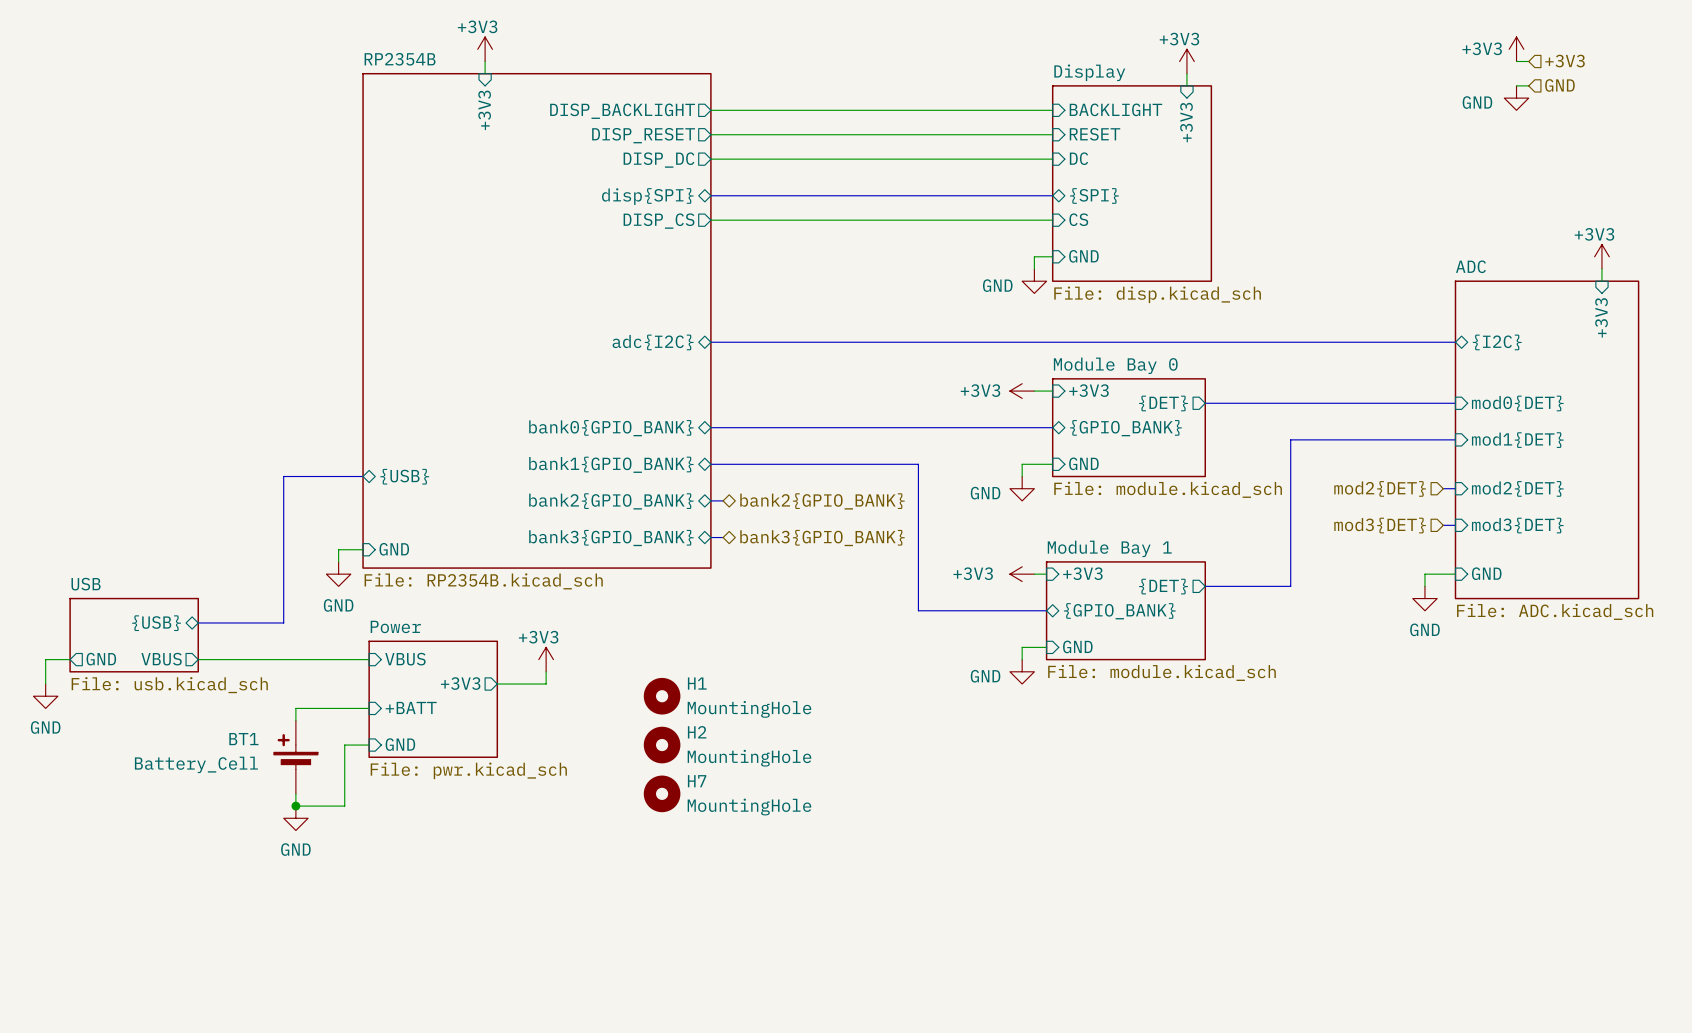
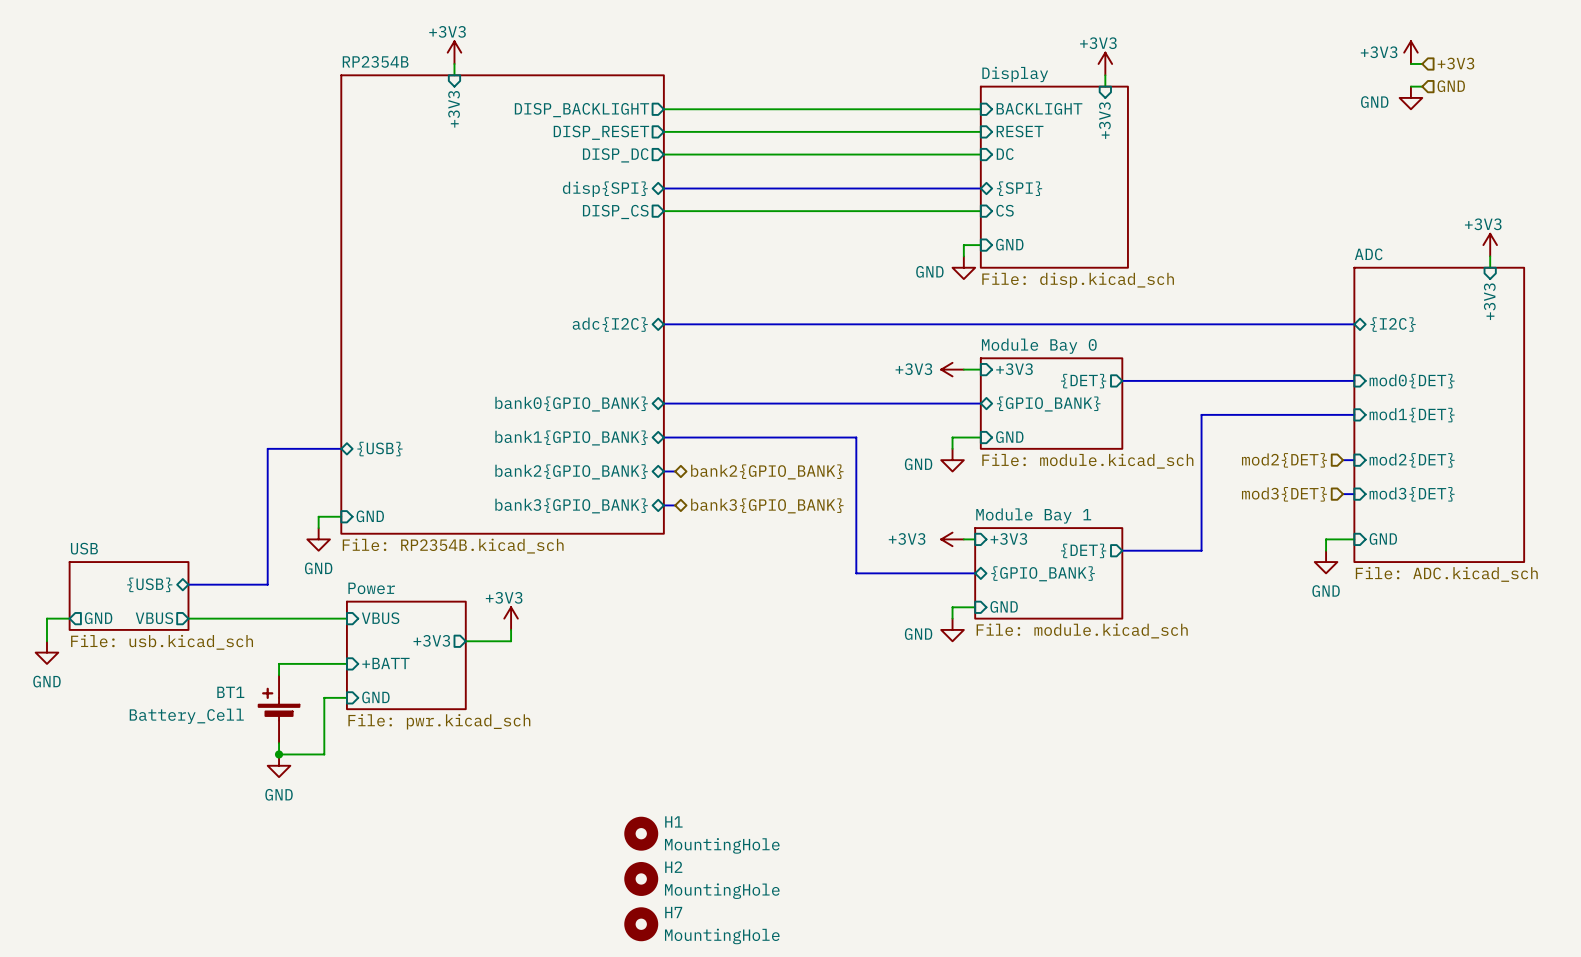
H1 position: (662, 696) -> (641, 833)
H2 position: (662, 745) -> (641, 878)
H7 position: (662, 793) -> (641, 924)

